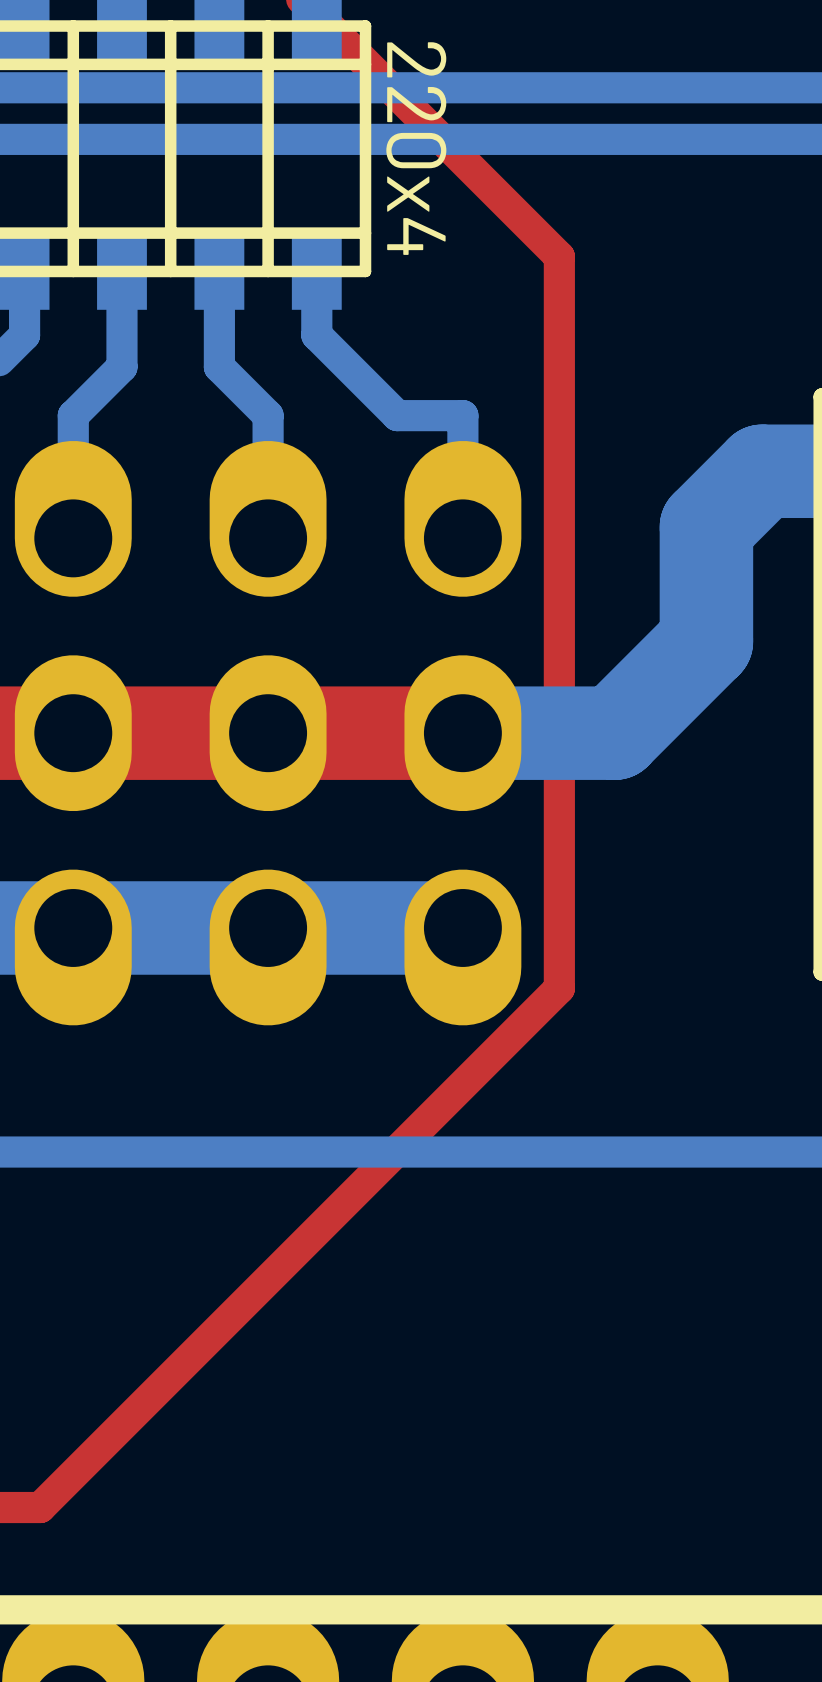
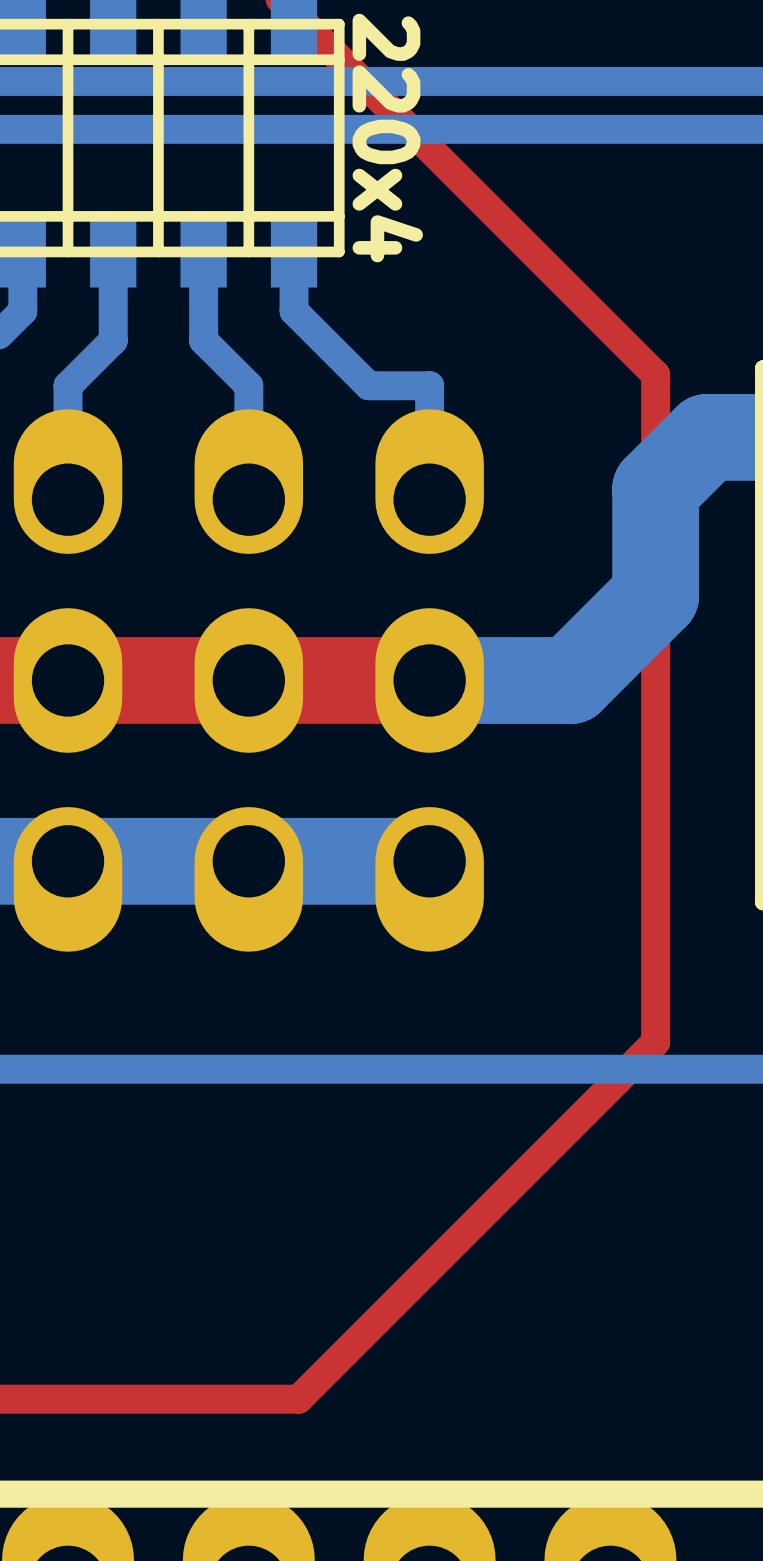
top track: (559, 256) (559, 988) (40, 1507) -> (519, 238) (655, 374) (655, 1042) (298, 1399) (37, 1399)

